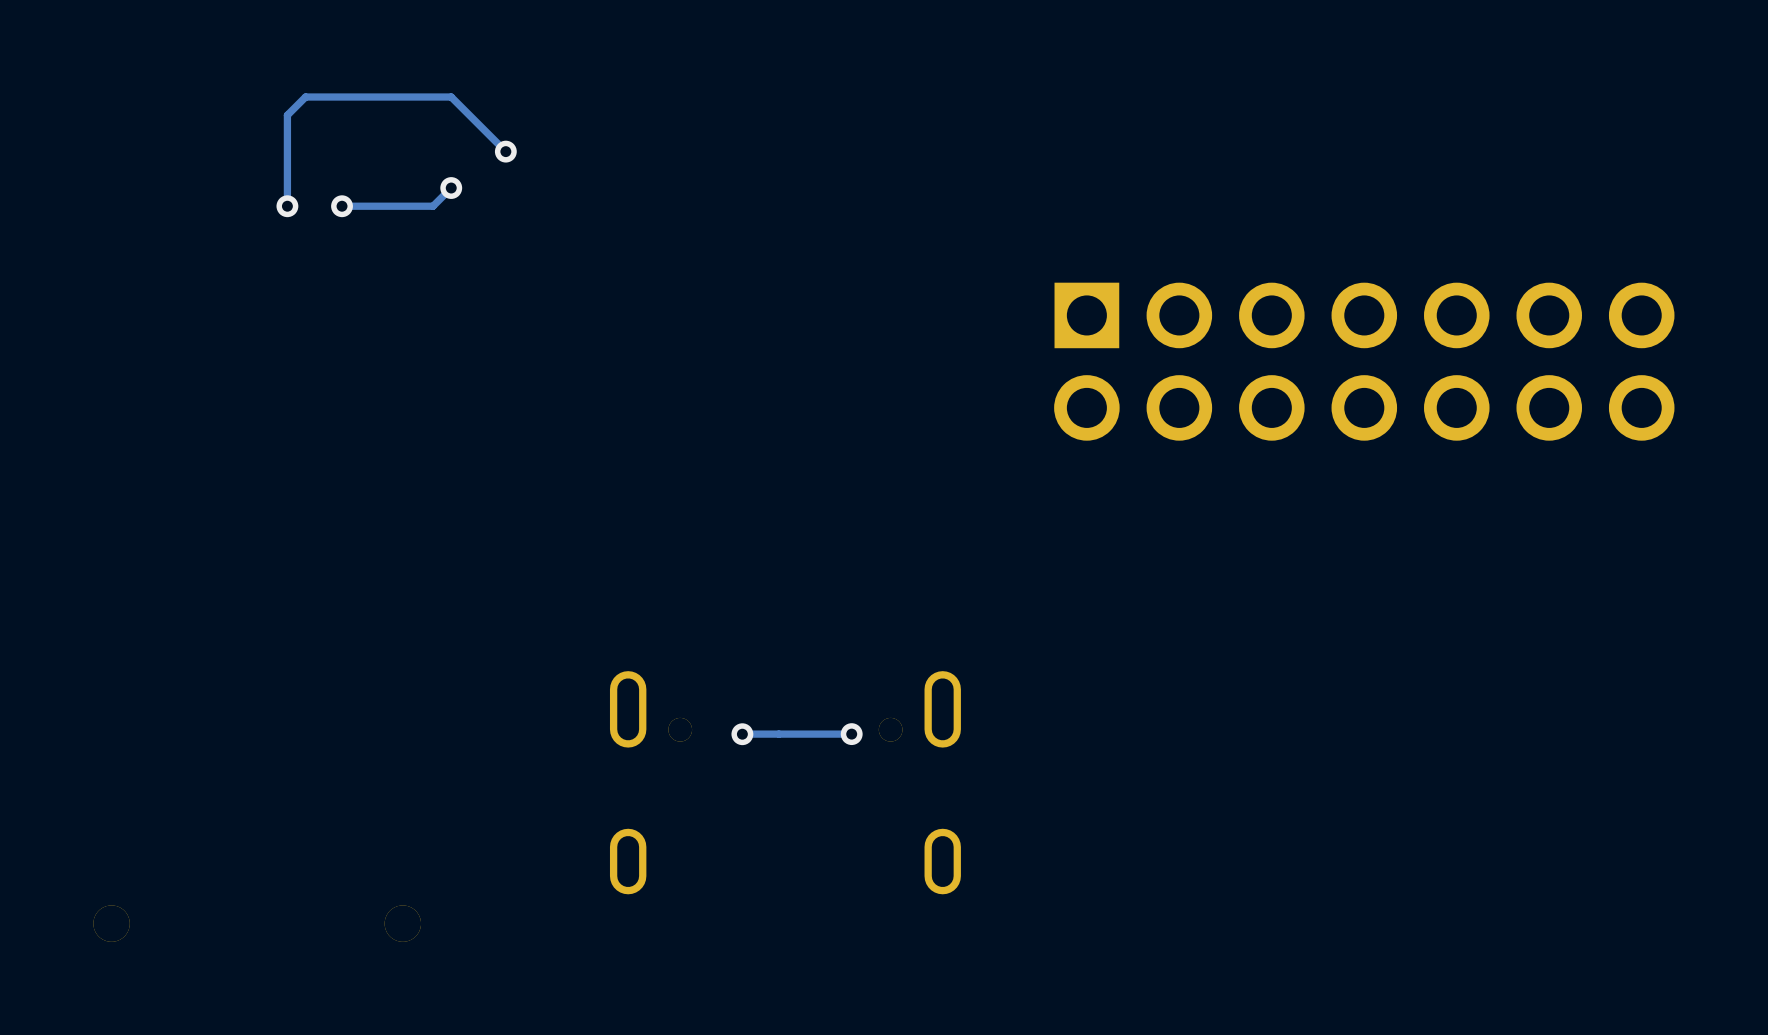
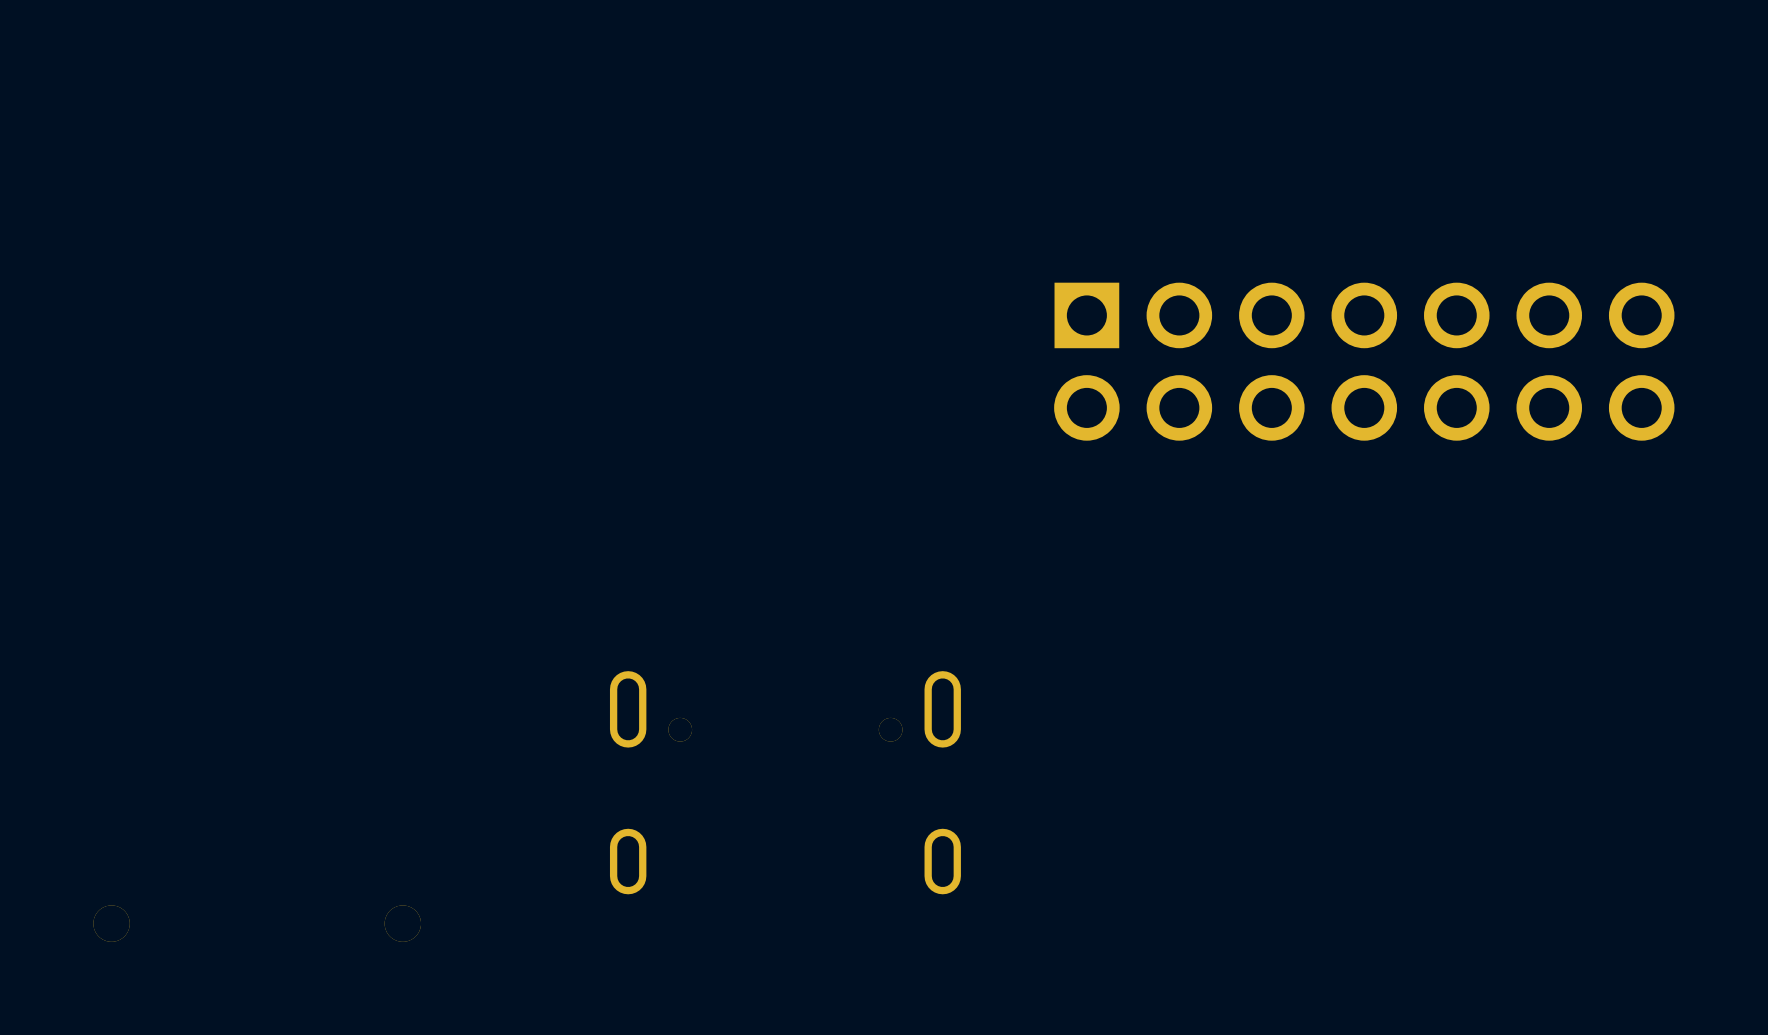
track: (505, 151) (451, 97) (305, 97) (287, 115) (287, 206) -> none
via: (505, 151) -> none
track: (451, 188) (433, 206) (342, 206) -> none
via: (451, 188) -> none
via: (287, 206) -> none
via: (342, 206) -> none
via: (742, 734) -> none
track: (851, 734) (742, 734) -> none
via: (851, 734) -> none

